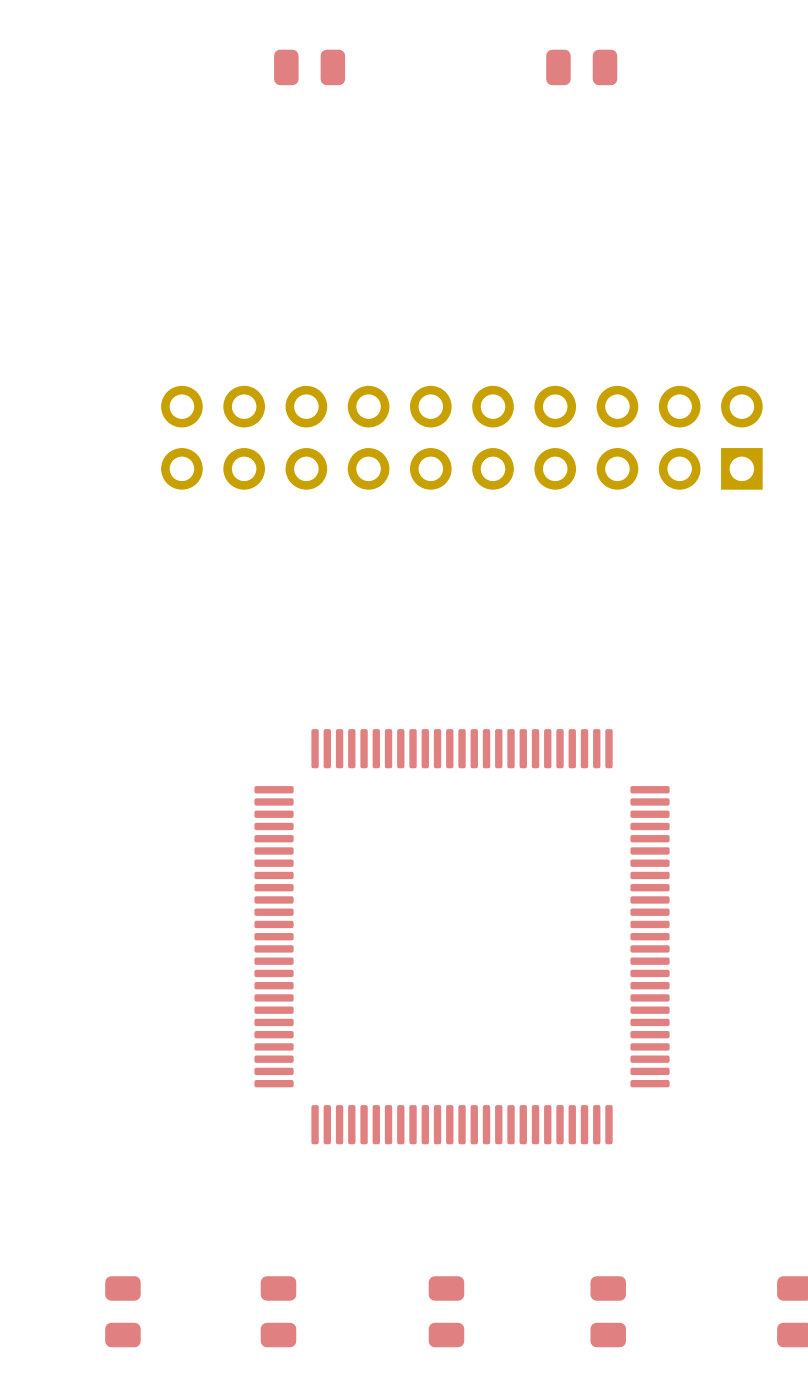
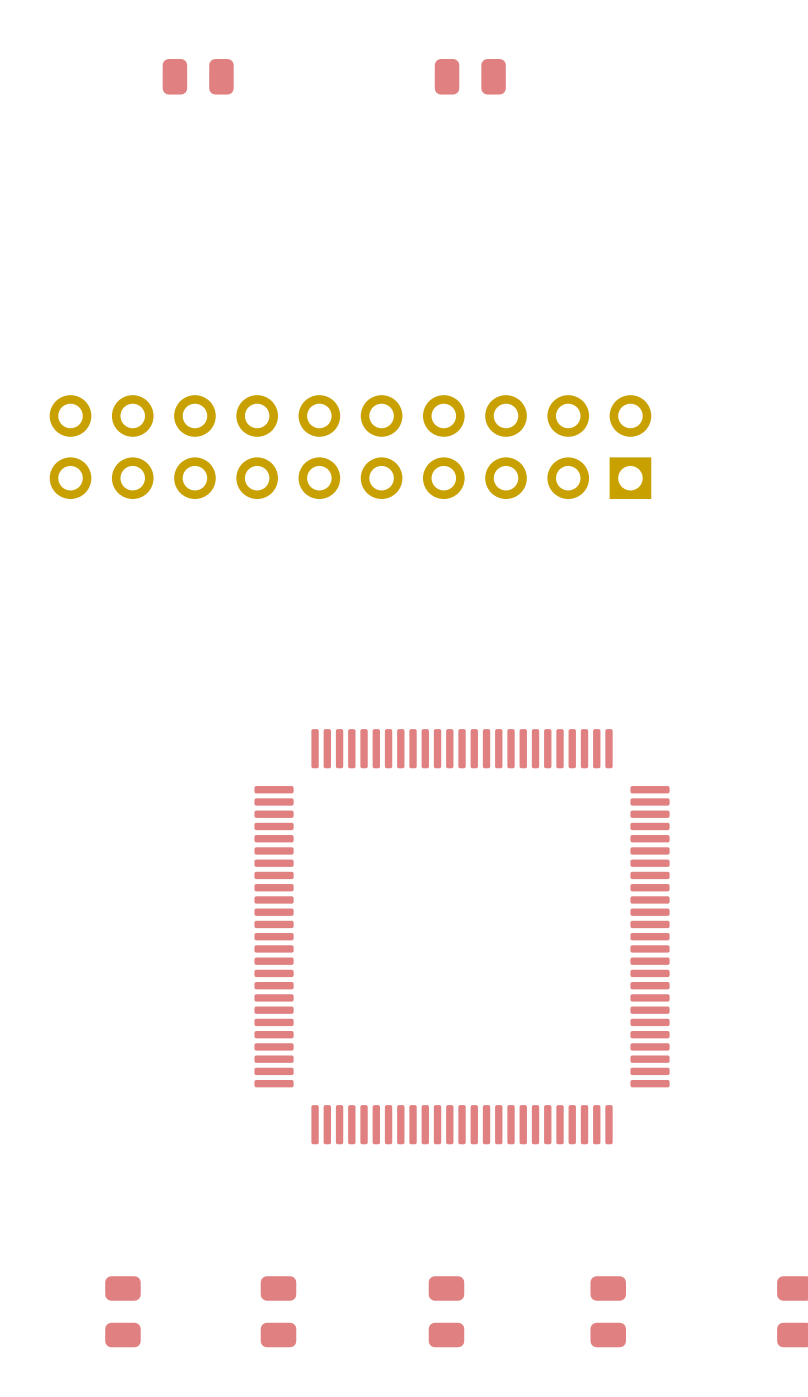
part: (309, 67) -> none
part: (581, 67) -> none
part: none -> (198, 76)
part: none -> (470, 76)
part position: (461, 437) -> (350, 447)

